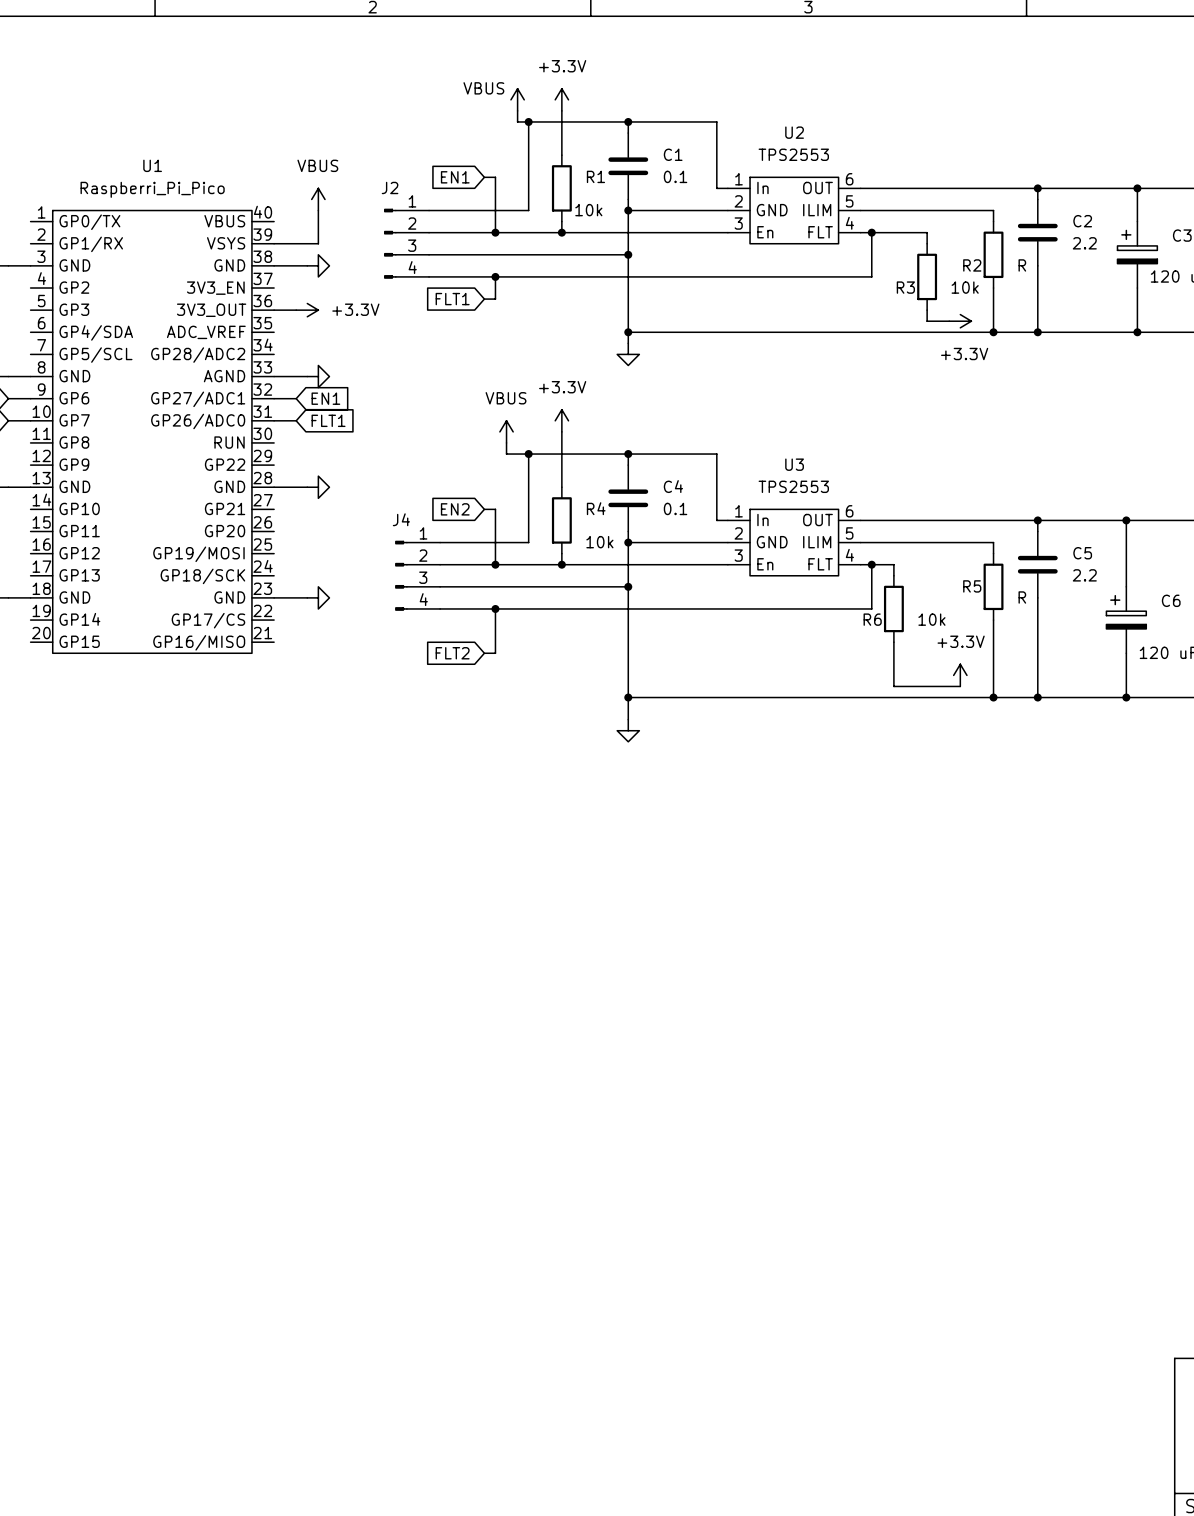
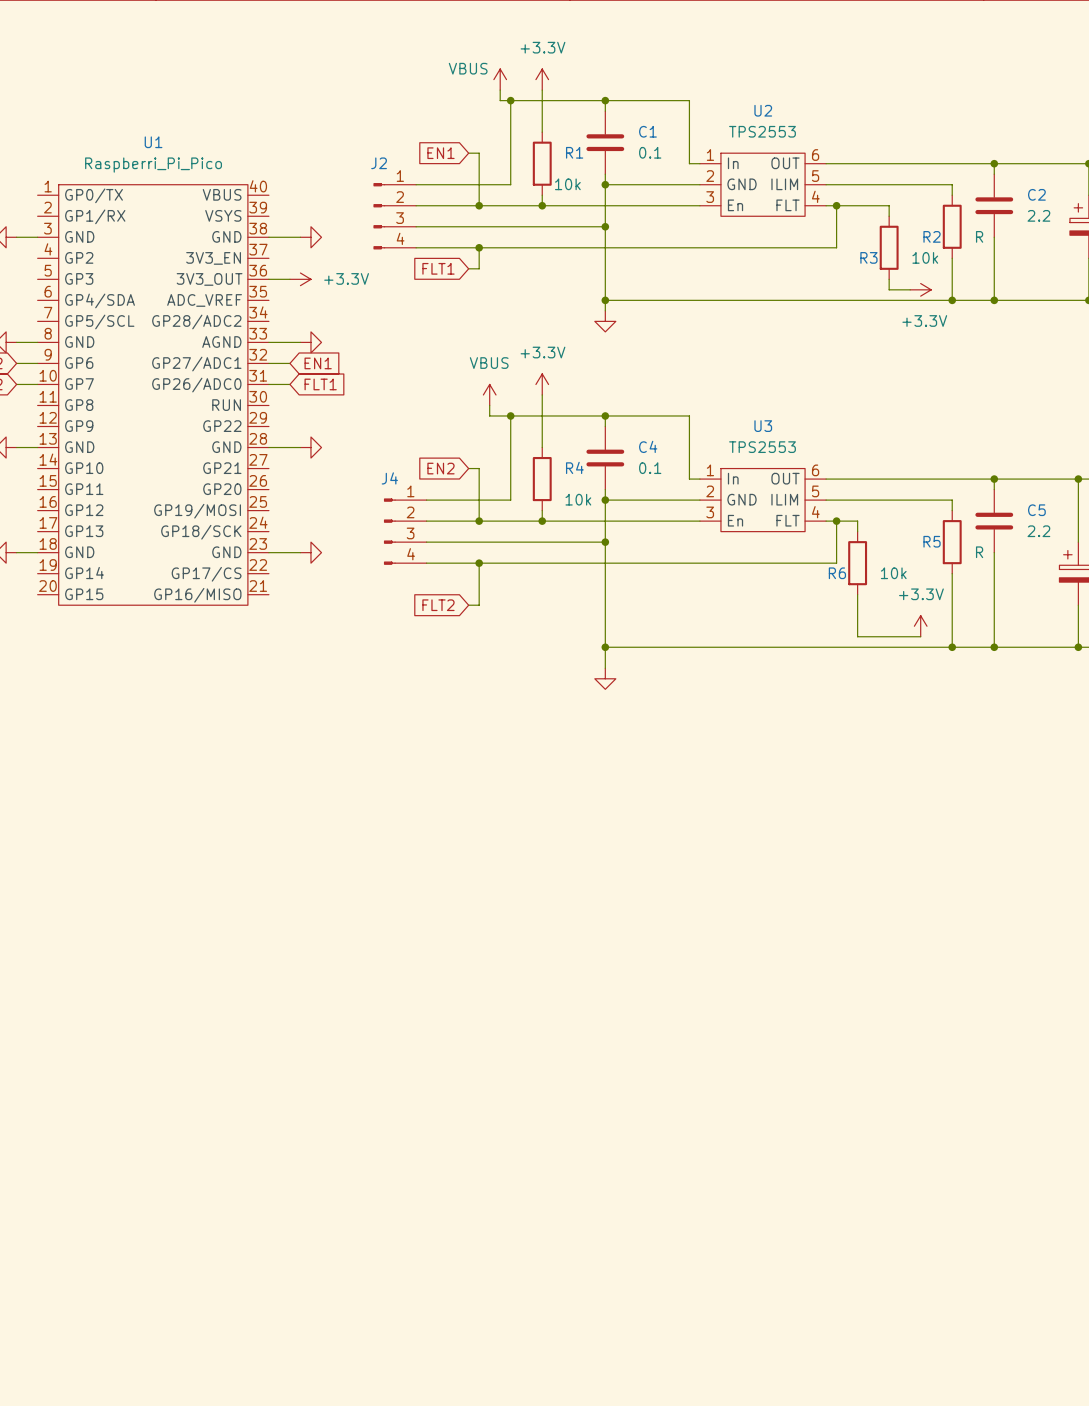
power symbol: VBUS (318, 199) -> none
wire: (318, 210) (318, 243) (274, 243) -> none

